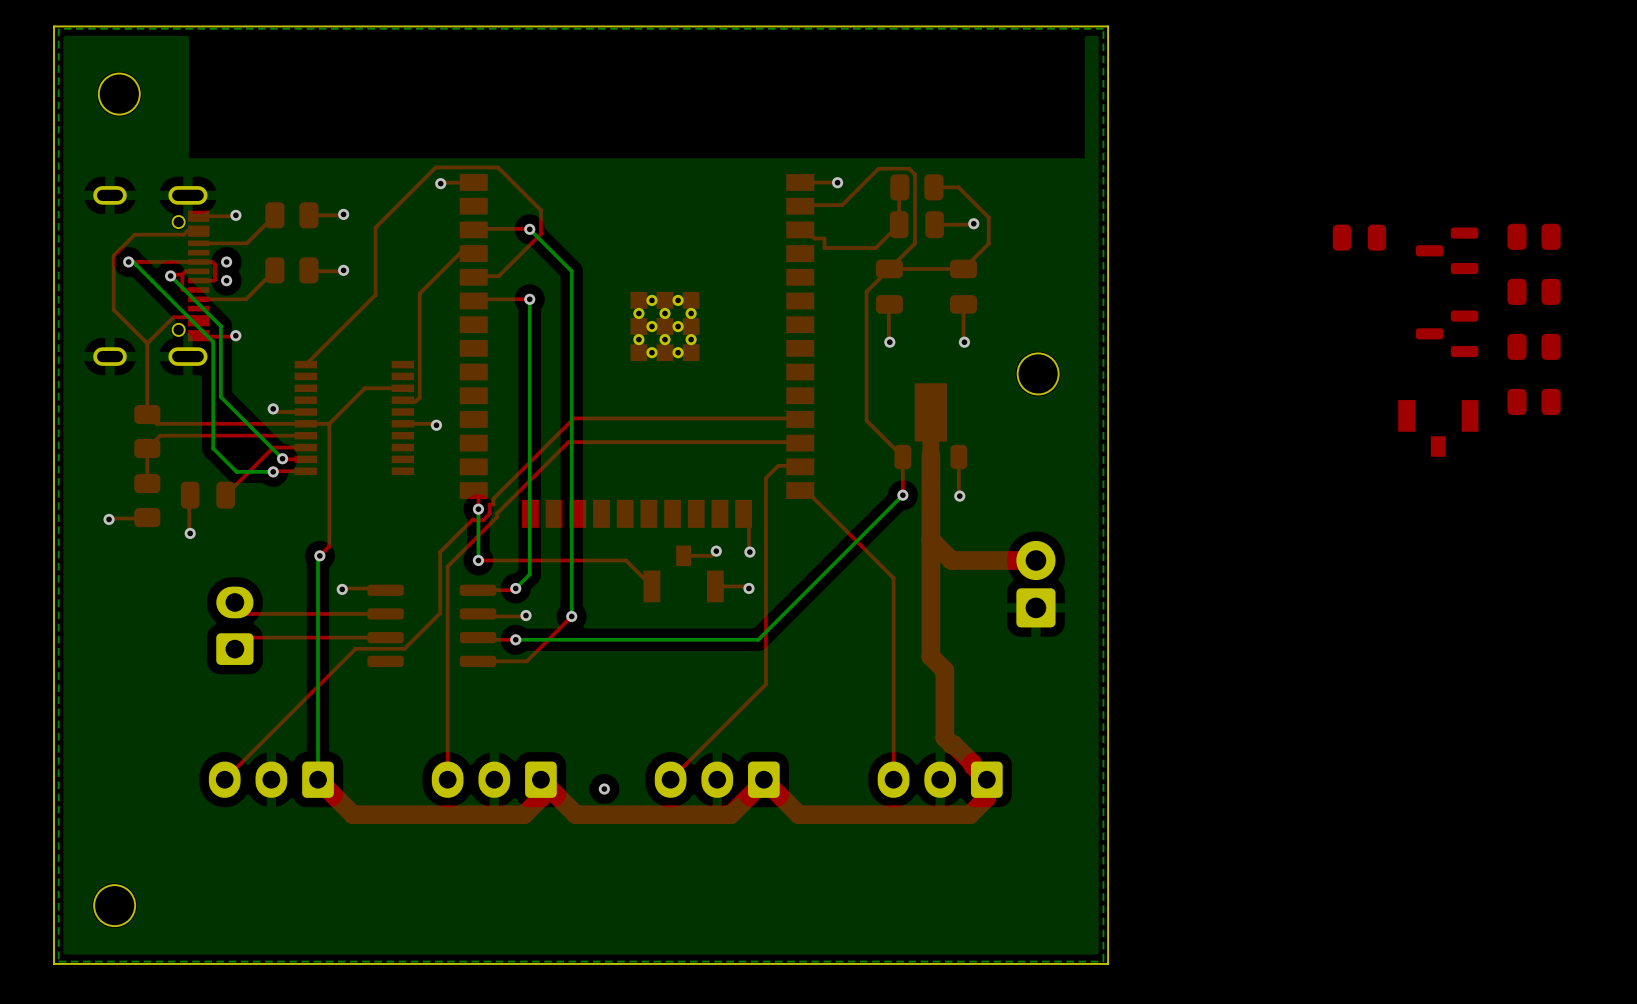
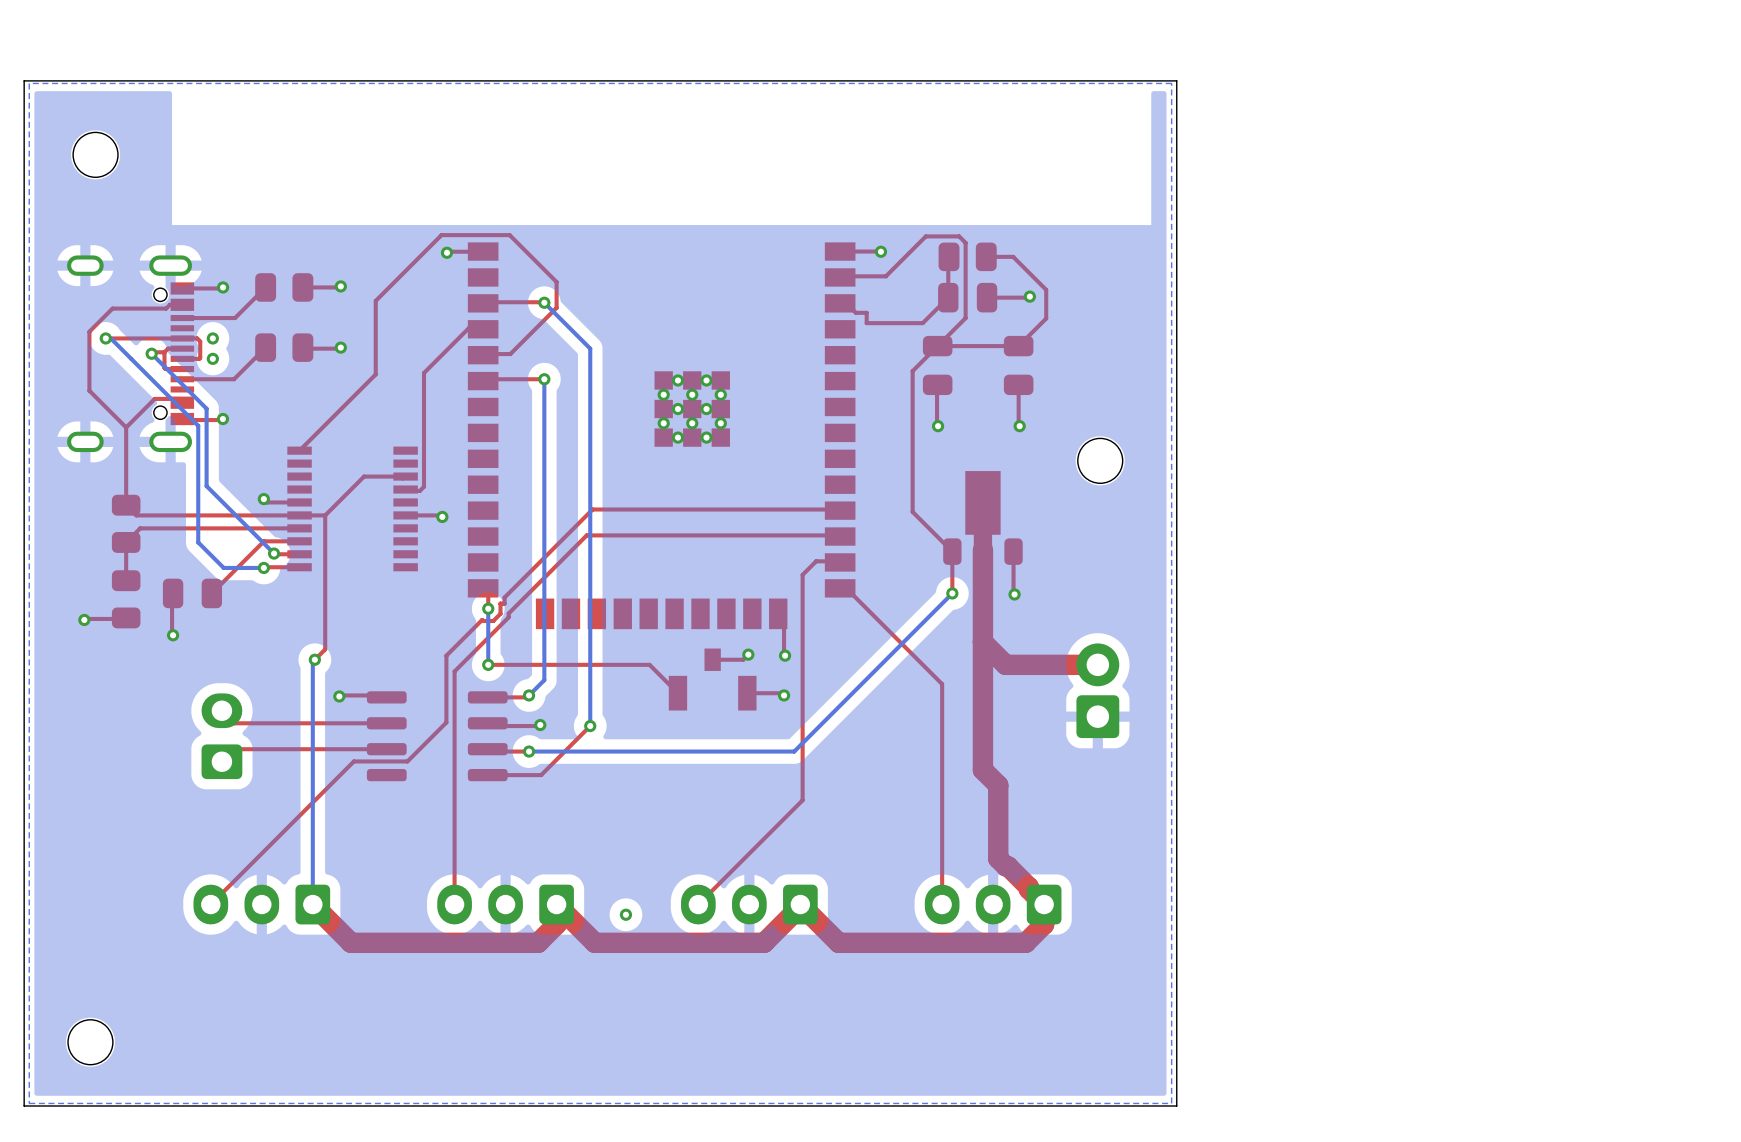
part: (1534, 236) -> none
part: (1359, 237) -> none
part: (1447, 250) -> none
part: (1534, 291) -> none
part: (1447, 333) -> none
part: (1534, 346) -> none
part: (1534, 401) -> none
part: (1438, 428) -> none

